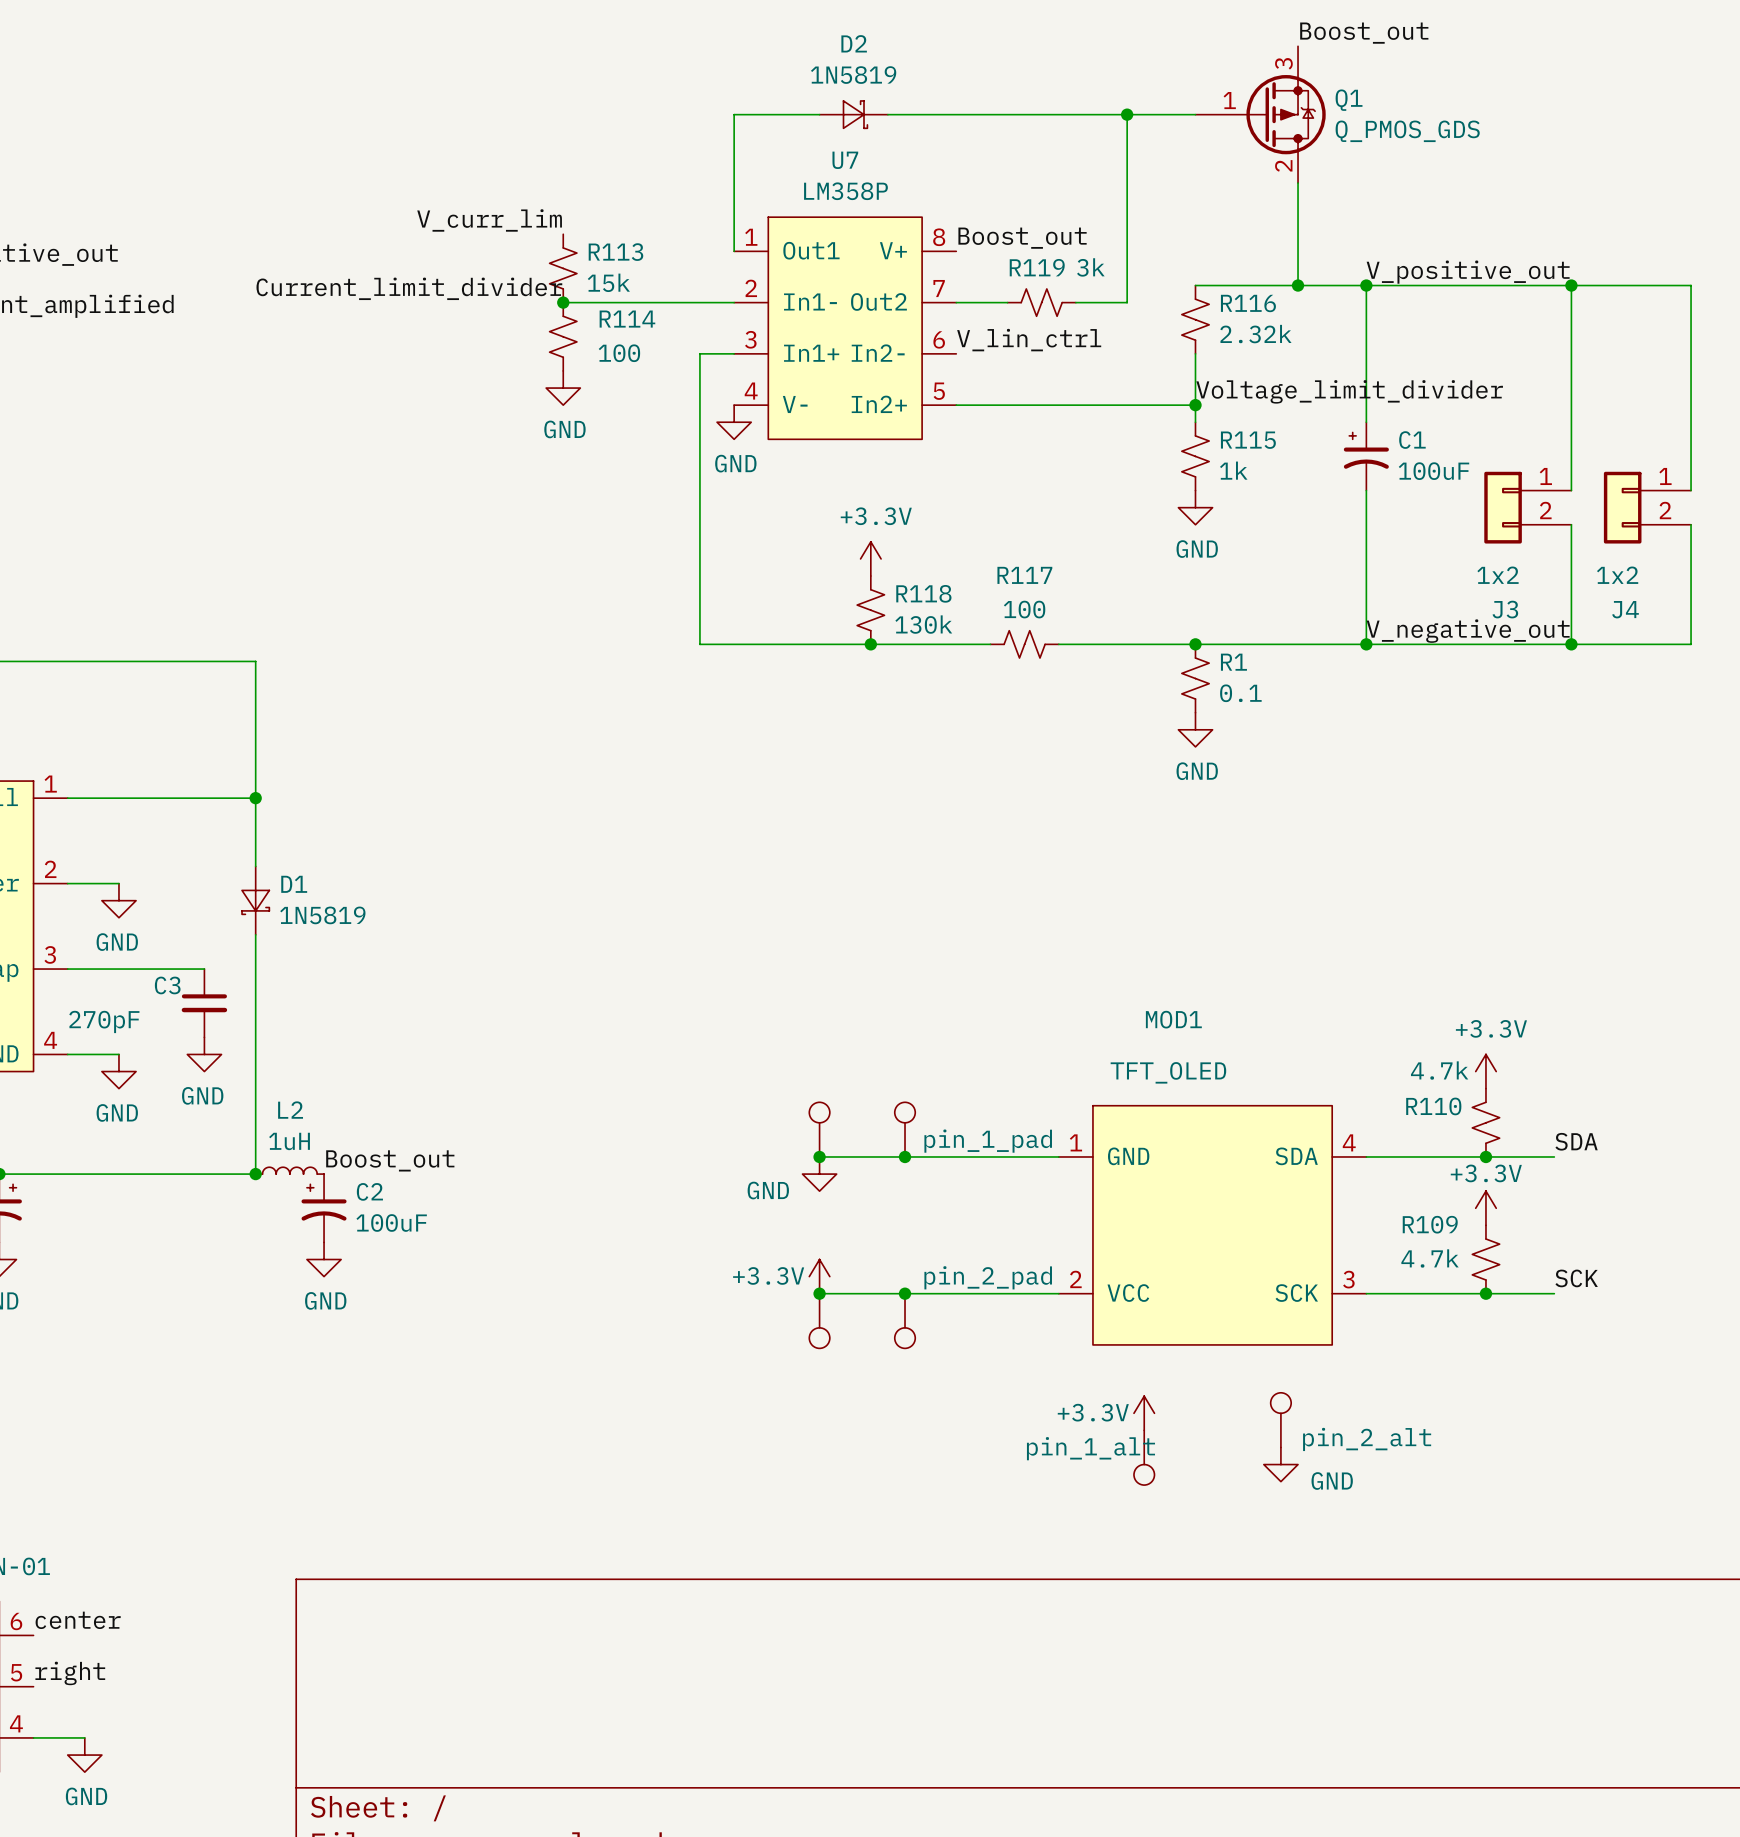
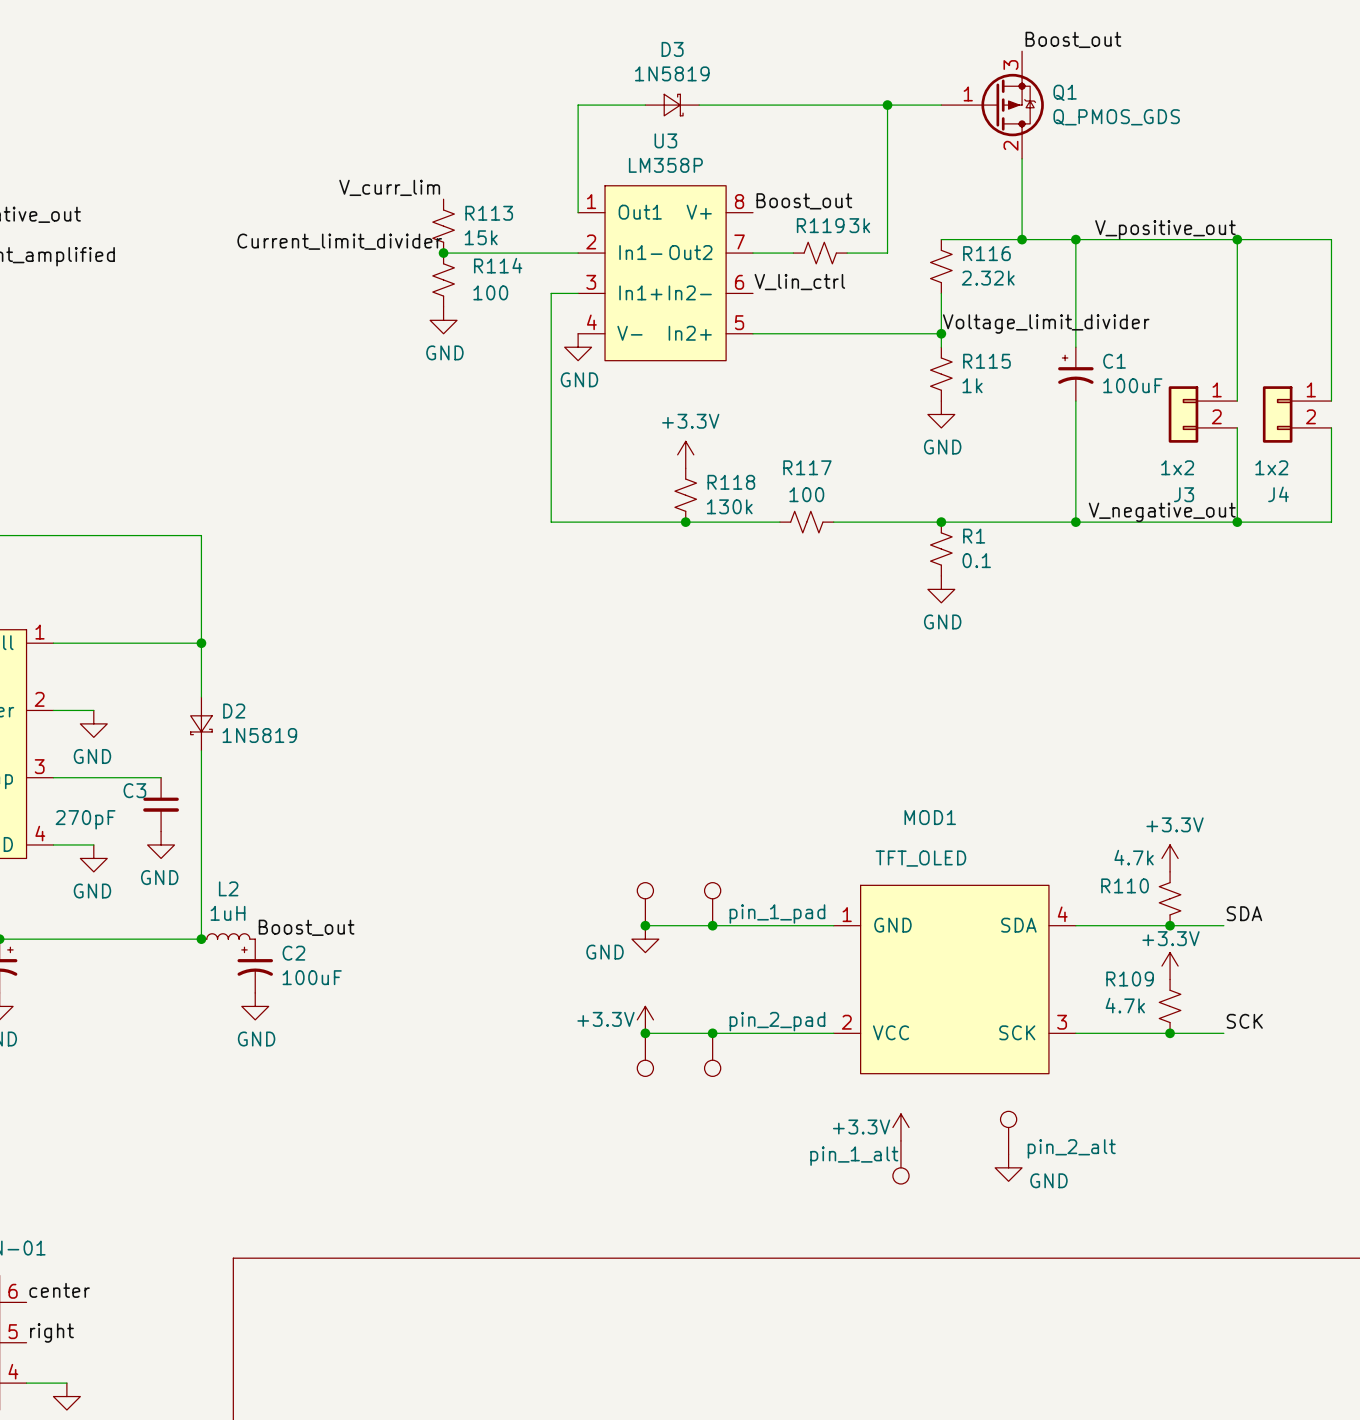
D2 name: D2 (854, 43) -> D3 (672, 49)
U7 name: U7 (845, 160) -> U3 (665, 140)
D1 name: D1 (294, 884) -> D2 (234, 711)

